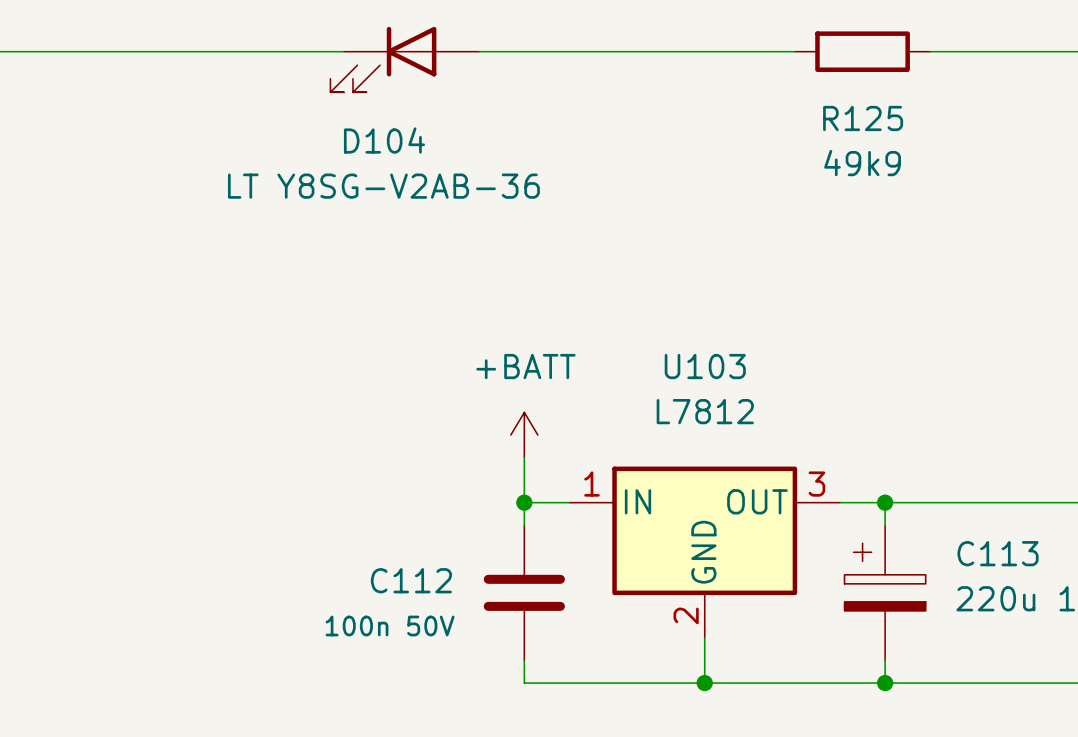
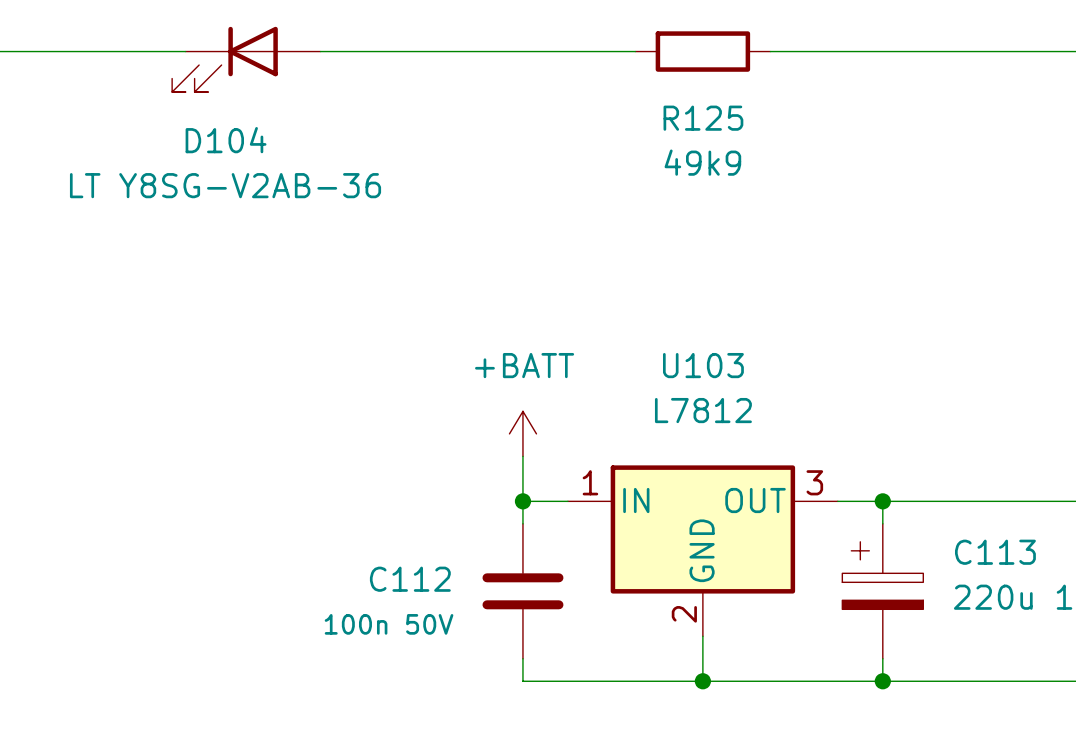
wire: (637, 51) (772, 51) -> (792, 51) (927, 51)
R125 position: (862, 51) -> (702, 51)
D104 position: (404, 59) -> (246, 59)

